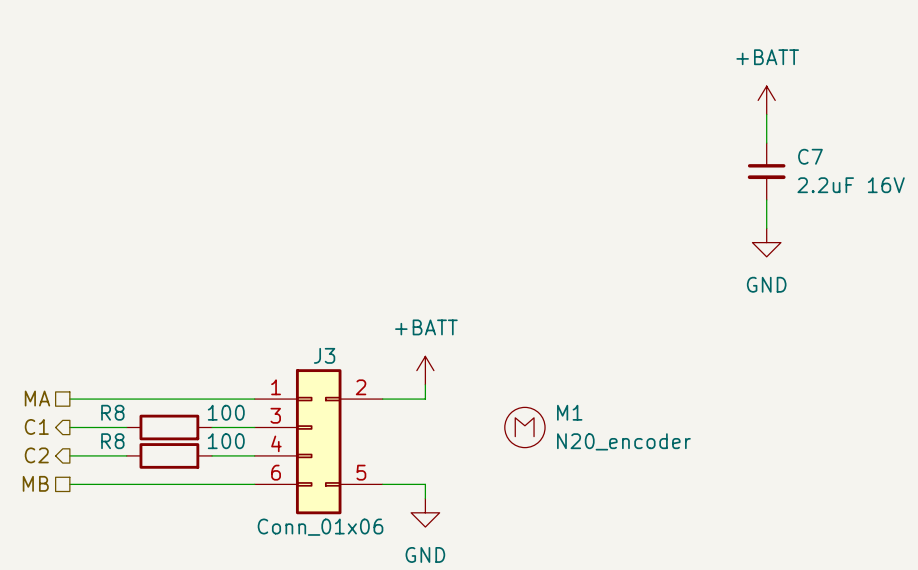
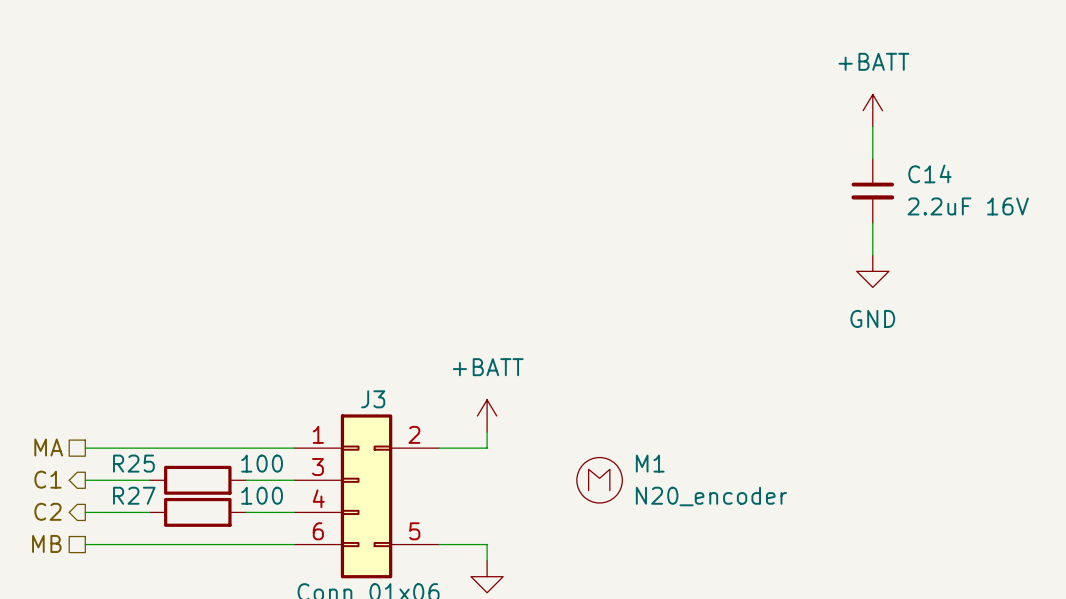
C7 name: C7 (810, 156) -> C14 (929, 173)
R8 name: R8 (112, 412) -> R25 (133, 463)
R8 name: R8 (112, 441) -> R27 (134, 495)

